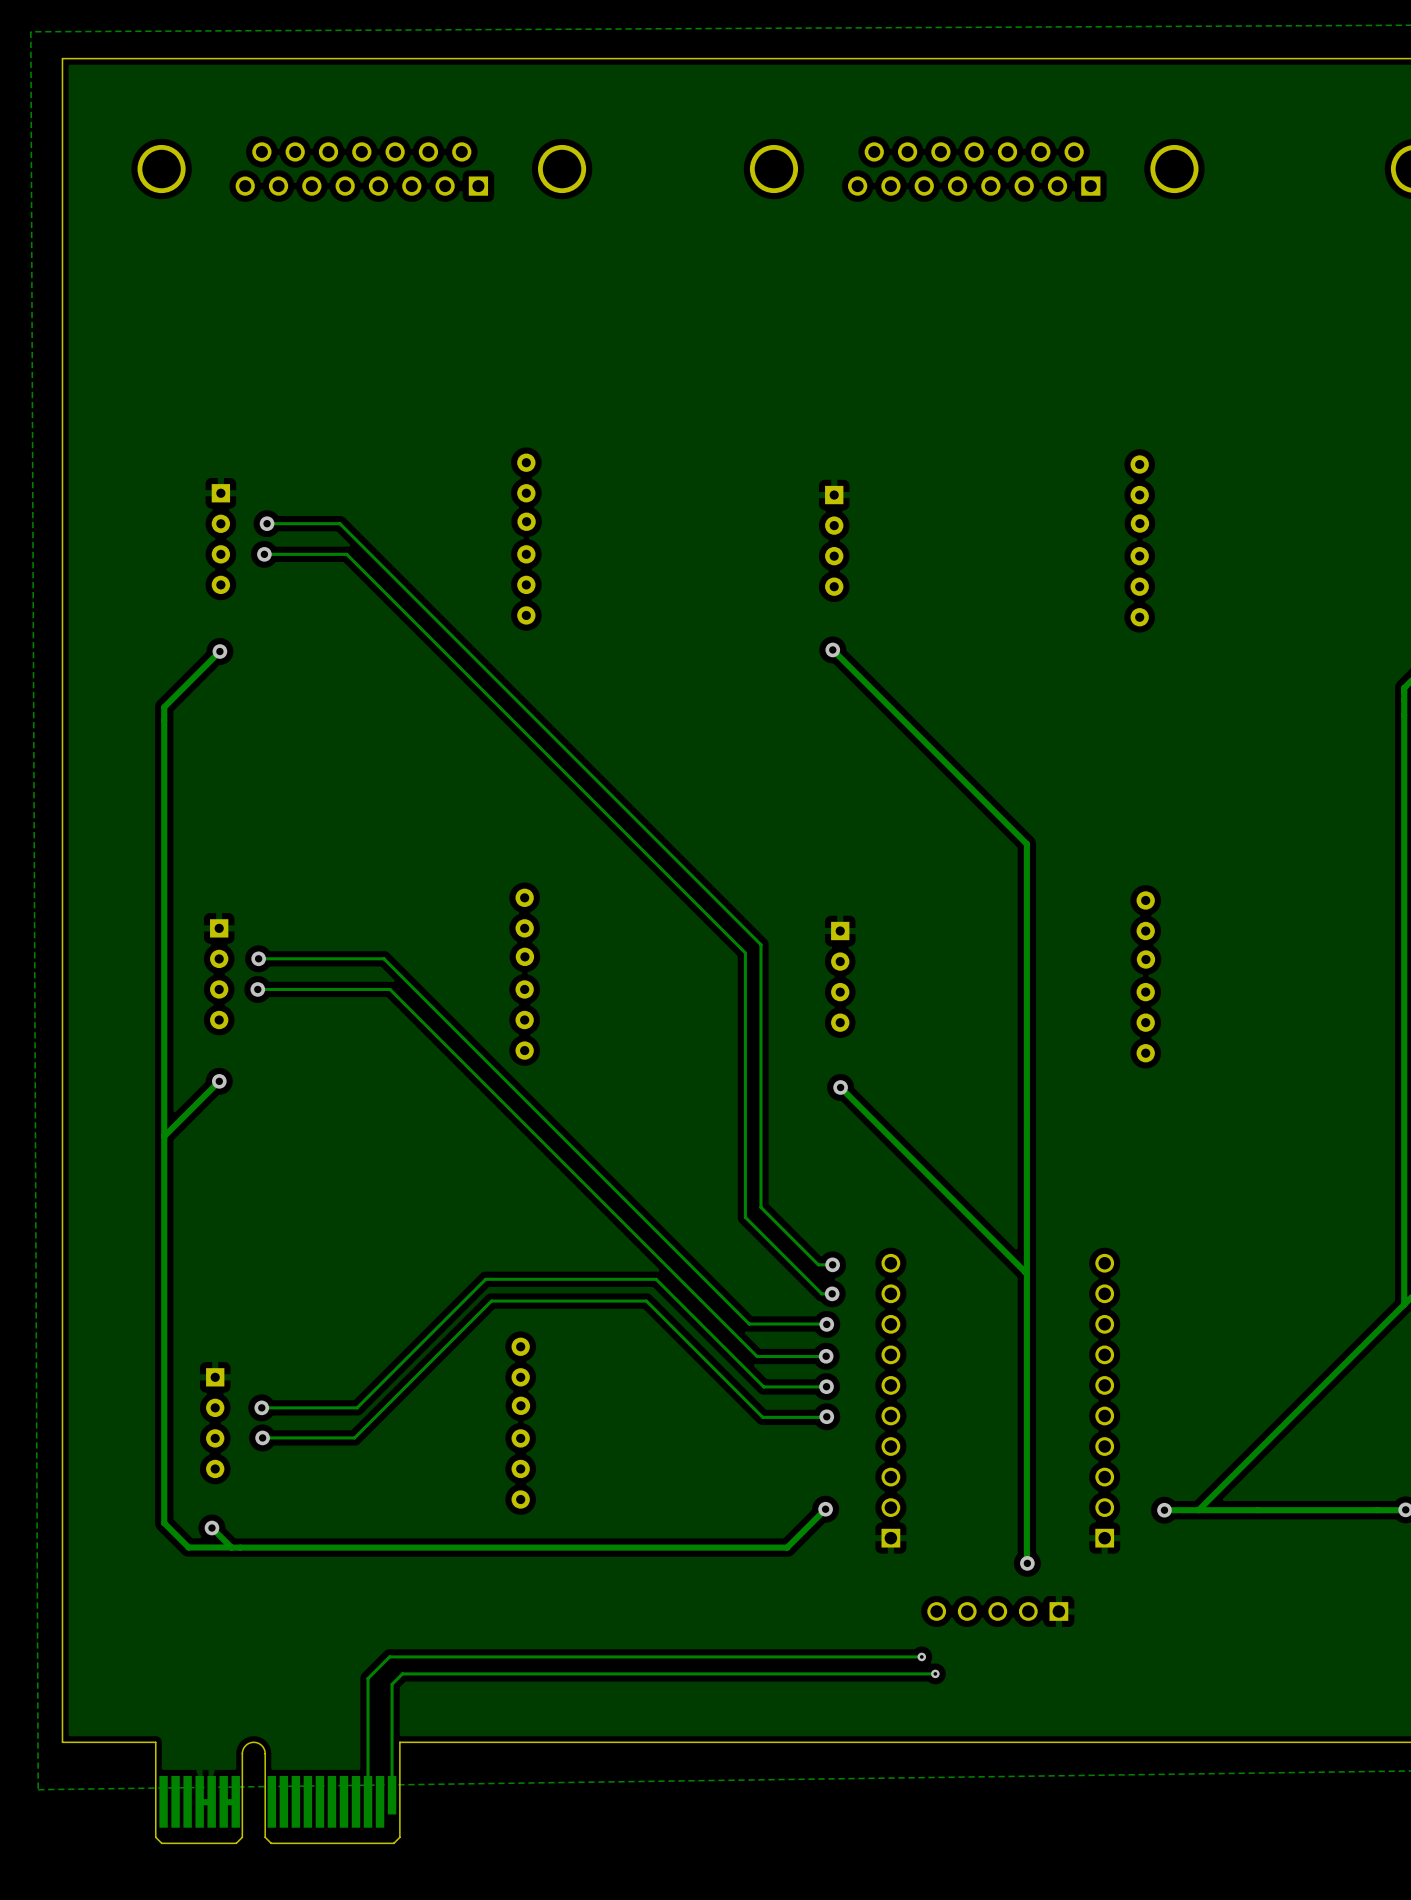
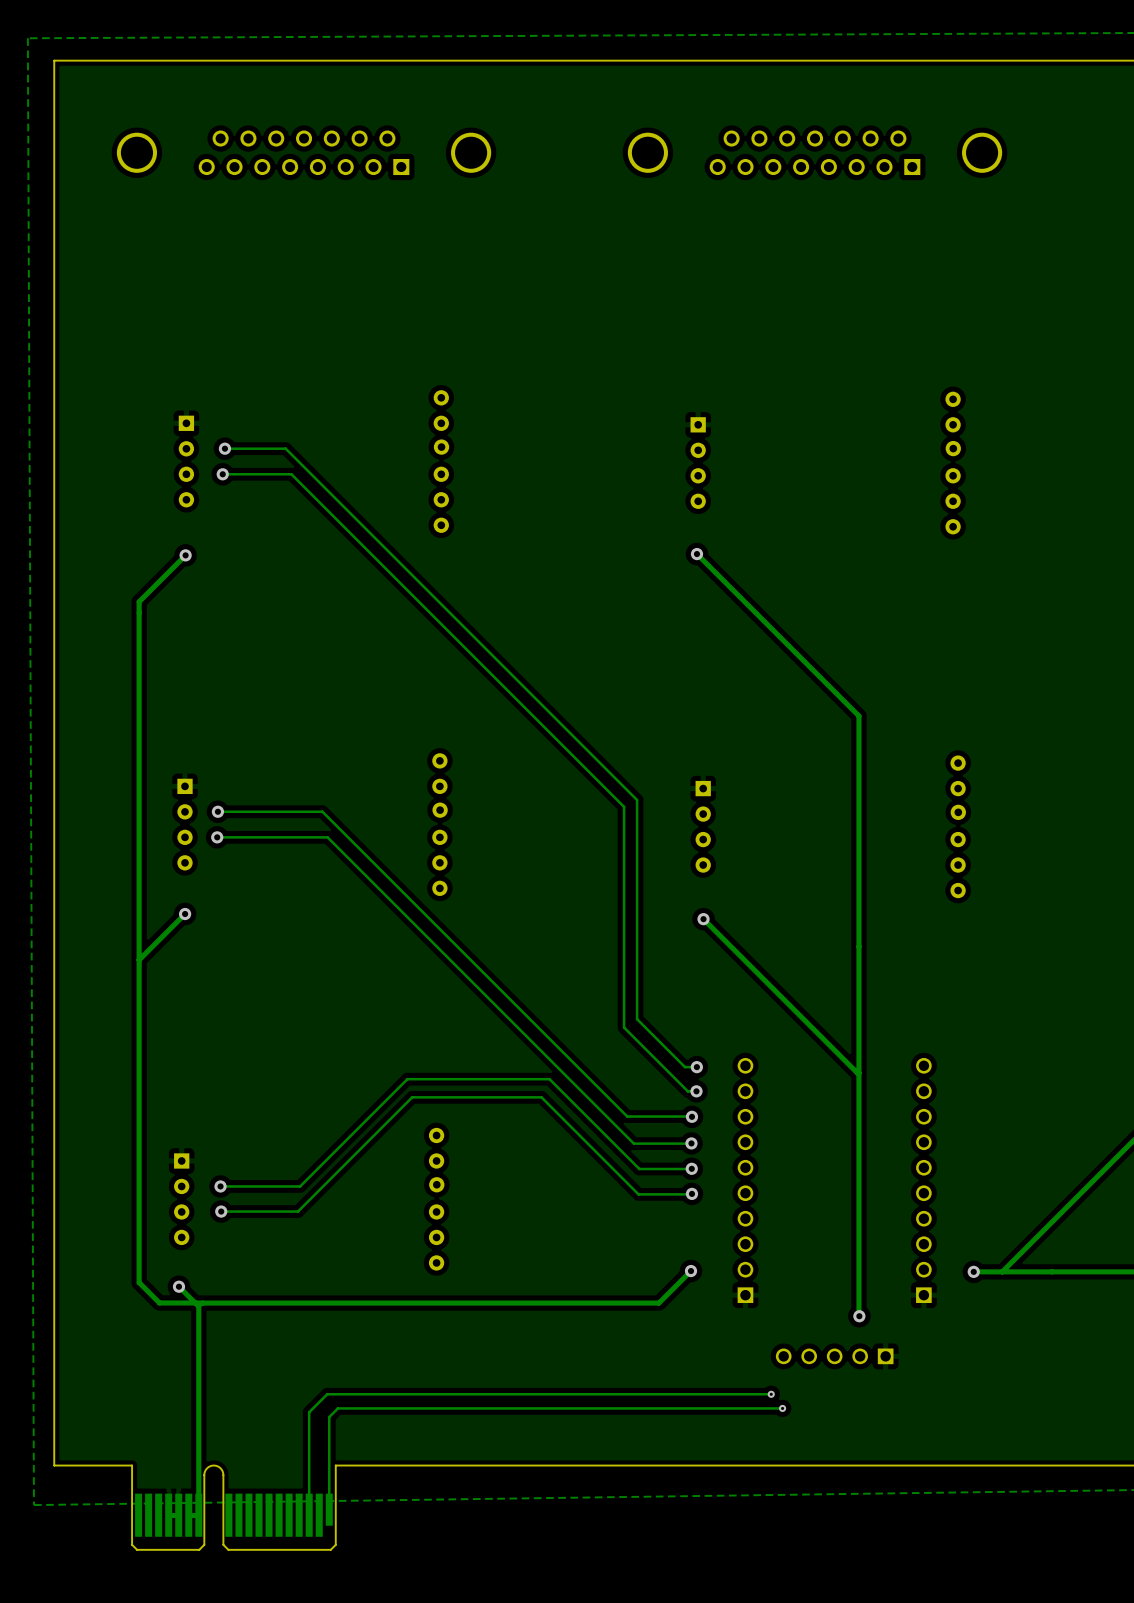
track: none -> (195, 1303) (198, 1306) (198, 1515)

